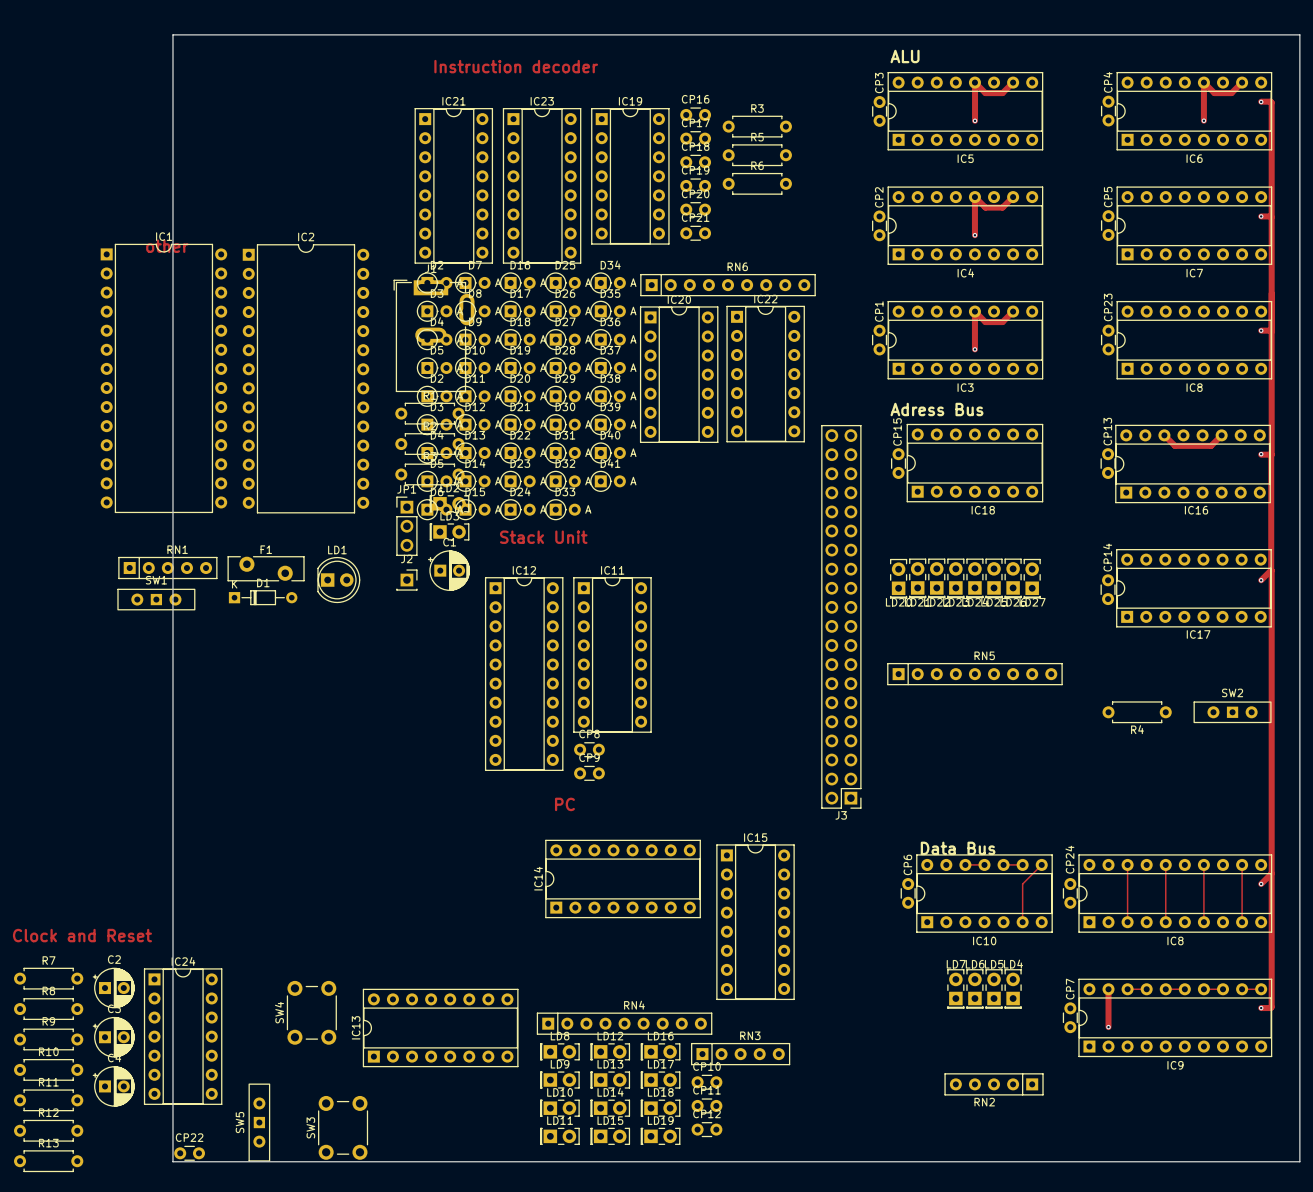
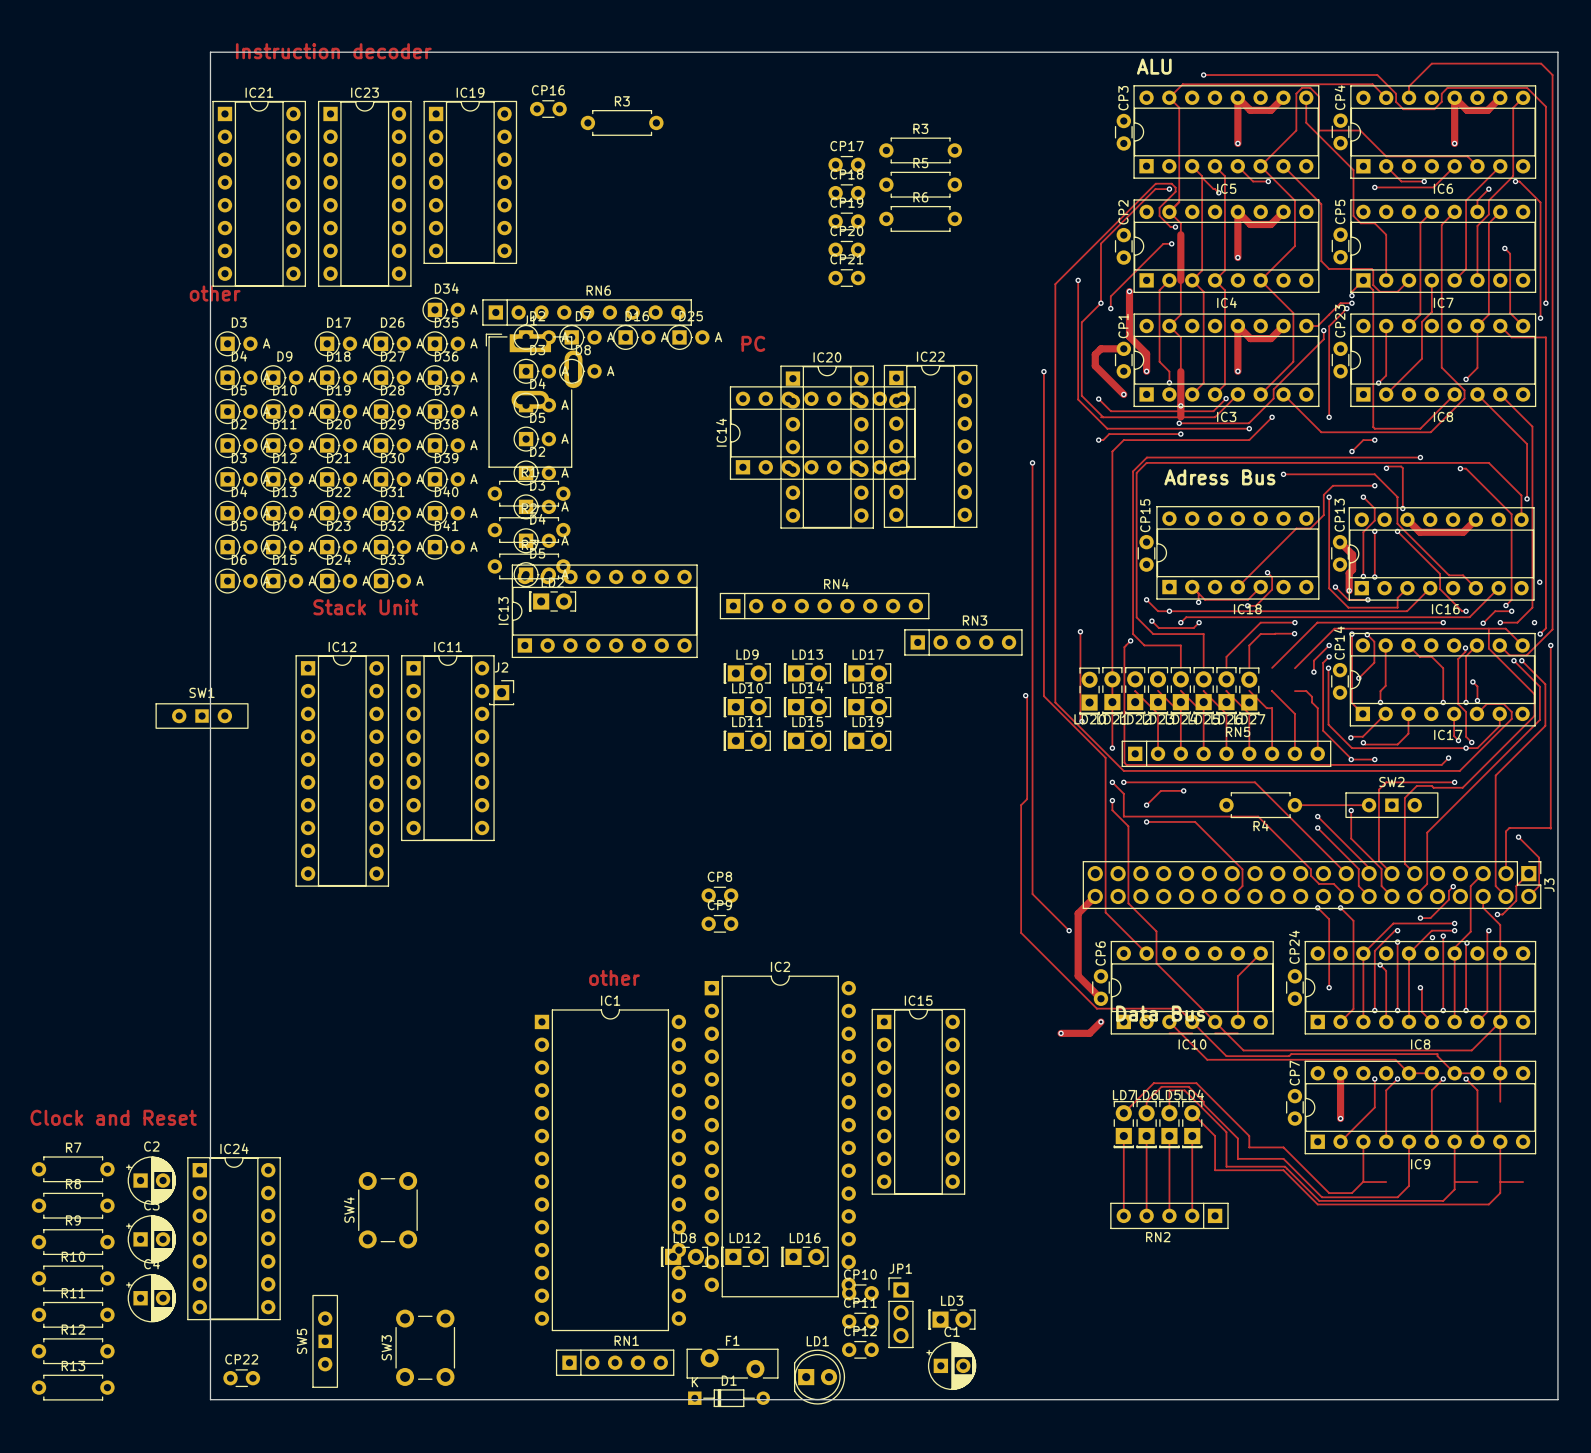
board edge: (172, 34) (1299, 34) (1299, 1161) (172, 1161) (172, 34) -> (210, 52) (1557, 52) (1557, 1399) (210, 1399) (210, 52)
text: none -> Instruction decoder (333, 51)
text position: ALU (905, 56) -> ALU (1154, 66)
track: none -> (1203, 75) (1377, 75) (1396, 93) (1396, 101) (1403, 109) (1434, 109) (1441, 101) (1441, 93) (1447, 87) (1527, 87) (1545, 106) (1545, 303)
via: none -> (1203, 75)
text: Instruction decoder (516, 66) -> none
track: (974, 82) (985, 93) (1002, 93) (1013, 82) -> (1237, 97) (1250, 110) (1270, 110) (1283, 97)
track: (975, 82) (975, 120) -> (1237, 97) (1237, 143)
track: none -> (1306, 97) (1306, 122) (1353, 170) (1353, 216) (1360, 223) (1374, 223) (1386, 234) (1386, 280)
track: none -> (1386, 97) (1372, 84) (1182, 84) (1169, 97) (1179, 107) (1179, 202)
track: none -> (1409, 97) (1409, 86) (1431, 63) (1541, 63) (1552, 75) (1552, 629) (1526, 655) (1509, 655) (1499, 645)
track: none -> (1523, 97) (1513, 107) (1513, 176) (1488, 200) (1488, 214) (1477, 225) (1477, 280)
track: (1261, 101) (1271, 102) (1271, 570) -> none
via: (1261, 101) -> none
R3: none -> (622, 122)
CP3 position: (879, 111) -> (1123, 132)
IC5 position: (965, 111) -> (1226, 131)
CP16 position: (695, 114) -> (548, 109)
via: (975, 120) -> none
via: none -> (1237, 143)
track: none -> (1192, 166) (1202, 176) (1202, 270) (1192, 280) (1203, 291) (1203, 383) (1192, 394)
track: none -> (1214, 166) (1224, 176) (1224, 270) (1215, 280) (1224, 290) (1224, 384) (1215, 394)
track: none -> (1237, 166) (1253, 181) (1268, 181)
track: none -> (1283, 166) (1321, 204) (1321, 261) (1329, 268) (1371, 268) (1373, 285) (1379, 291) (1397, 291) (1409, 280)
track: none -> (1386, 166) (1401, 181) (1424, 181)
track: none -> (1454, 166) (1433, 187) (1374, 187)
track: none -> (1477, 166) (1467, 156) (1386, 156) (1360, 130) (1319, 130) (1319, 96) (1310, 87) (1302, 87) (1296, 93) (1296, 130) (1260, 166) (1294, 200) (1294, 246) (1260, 280) (1293, 313) (1293, 361) (1260, 394)
track: none -> (1500, 166) (1466, 200) (1466, 268) (1454, 280)
track: none -> (1202, 177) (1218, 192)
via: none -> (1268, 181)
via: none -> (1424, 181)
track: none -> (1515, 181) (1519, 181) (1540, 202) (1540, 318)
via: none -> (1515, 181)
via: none -> (1374, 187)
track: none -> (1169, 189) (1155, 189) (1100, 243) (1100, 303) (1081, 322) (1081, 395) (1103, 417)
via: none -> (1169, 189)
track: none -> (1488, 189) (1477, 200) (1477, 211)
via: none -> (1488, 189)
via: none -> (1218, 192)
IC19 position: (630, 176) -> (470, 182)
track: none -> (1283, 211) (1270, 224) (1250, 224) (1237, 211) (1237, 257)
track: none -> (1431, 211) (1420, 223) (1420, 314) (1409, 326)
track: none -> (1454, 211) (1441, 224) (1441, 367) (1464, 390) (1464, 398) (1430, 432) (1321, 432) (1283, 394)
track: none -> (1500, 211) (1488, 223) (1488, 314) (1477, 326) (1477, 367) (1466, 379)
IC21 position: (453, 185) -> (259, 193)
IC23 position: (542, 185) -> (364, 193)
track: none -> (1175, 227) (1170, 227) (1159, 216) (1159, 207) (1175, 191) (1175, 187) (1171, 183) (1155, 183) (1055, 284) (1055, 702) (1123, 770) (1459, 770) (1511, 718) (1511, 711) (1503, 704) (1486, 704) (1476, 713)
via: none -> (1175, 227)
track: (974, 197) (985, 207) (1002, 207) (1013, 197) -> (1180, 234) (1180, 223) (1169, 211) (1179, 202)
track: none -> (1171, 243) (1163, 243) (1110, 296) (1110, 308)
via: none -> (1171, 243)
track: none -> (1504, 248) (1510, 253) (1510, 313) (1523, 326)
via: none -> (1237, 257)
track: (1261, 216) (1271, 217) -> none
via position: (1261, 216) -> (1504, 248)
CP2 position: (879, 225) -> (1123, 246)
IC4 position: (965, 225) -> (1226, 246)
CP5 position: (1108, 225) -> (1340, 245)
IC7 position: (1194, 225) -> (1443, 246)
track: none -> (1078, 280) (1078, 399) (1107, 428) (1249, 428)
via: none -> (1078, 280)
track: none -> (1169, 280) (1159, 290) (1159, 361) (1169, 371) (1169, 382)
via: (974, 235) -> none
track: none -> (1431, 280) (1431, 312) (1421, 321) (1421, 358) (1386, 394)
track: none -> (1129, 291) (1129, 336) (1146, 353) (1146, 371)
via: none -> (1129, 291)
track: none -> (1351, 295) (1351, 291) (1363, 280) (1373, 290) (1373, 427) (1374, 428) (1420, 428) (1454, 394)
via: none -> (1351, 295)
via: none -> (1100, 303)
track: none -> (1351, 303) (1340, 303) (1317, 326) (1306, 326)
via: none -> (1351, 303)
via: none -> (1545, 303)
via: none -> (1110, 308)
track: none -> (1346, 308) (1329, 326) (1329, 417)
via: none -> (1346, 308)
via: none -> (1540, 318)
track: none -> (1283, 326) (1270, 338) (1250, 338) (1237, 326) (1237, 371)
track: none -> (1386, 326) (1386, 375) (1378, 383)
track: none -> (1500, 326) (1511, 337) (1545, 337) (1545, 628) (1540, 634)
track: none -> (1323, 330) (1323, 339) (1273, 389) (1273, 398) (1248, 423) (1179, 423)
via: none -> (1323, 330)
D34 position: (608, 282) -> (443, 309)
RN6 position: (728, 285) -> (587, 312)
D3: none -> (236, 343)
text: none -> PC (753, 343)
track: none -> (1123, 348) (1100, 348) (1095, 354) (1095, 365) (1123, 394)
D17 position: (517, 311) -> (335, 343)
D26 position: (563, 311) -> (389, 343)
D35 position: (608, 311) -> (443, 343)
track: none -> (1043, 371) (1043, 696) (1105, 757) (1105, 912) (1146, 953)
via: none -> (1043, 371)
via: none -> (1146, 371)
track: (974, 311) (985, 322) (1002, 322) (1013, 311) -> (1180, 371) (1180, 337) (1169, 326) (1180, 314) (1180, 280)
via: none -> (1237, 371)
D4: none -> (236, 377)
via: none -> (1466, 379)
via: none -> (1169, 382)
via: none -> (1378, 383)
via: none -> (1123, 394)
track: none -> (1237, 394) (1215, 417) (1100, 417)
track: none -> (1477, 394) (1527, 444) (1527, 498)
track: none -> (1500, 394) (1532, 426) (1532, 607) (1517, 622) (1500, 622)
track: (1261, 330) (1271, 331) -> none
via: (1261, 330) -> none
via: none -> (1098, 399)
track: none -> (1226, 398) (1213, 411) (1110, 411) (1098, 399)
via: none -> (1226, 398)
D9 position: (472, 339) -> (282, 377)
D18 position: (517, 339) -> (335, 377)
D27 position: (563, 339) -> (389, 377)
D36 position: (608, 339) -> (443, 377)
CP1 position: (879, 340) -> (1123, 360)
IC3 position: (965, 340) -> (1226, 360)
via: none -> (1180, 405)
CP23 position: (1108, 340) -> (1340, 360)
IC8 position: (1194, 340) -> (1443, 360)
D5: none -> (236, 411)
via: (974, 349) -> none
track: none -> (1272, 417) (1249, 440) (1123, 440) (1112, 451) (1112, 748)
via: none -> (1272, 417)
via: none -> (1329, 417)
via: none -> (1179, 423)
via: none -> (1249, 428)
track: none -> (1180, 434) (1109, 434) (1103, 440) (1098, 440)
via: none -> (1180, 434)
D10 position: (472, 367) -> (282, 411)
D19 position: (517, 367) -> (335, 411)
D28 position: (563, 367) -> (389, 411)
D37 position: (608, 367) -> (443, 411)
via: none -> (1098, 440)
track: none -> (1374, 440) (1363, 440) (1351, 451)
via: none -> (1374, 440)
D2: none -> (236, 445)
IC1 position: (163, 378) -> (610, 1170)
IC2 position: (306, 378) -> (780, 1136)
via: none -> (1351, 451)
track: none -> (1420, 457) (1146, 457) (1133, 471) (1133, 634) (1144, 645) (1180, 645) (1180, 667)
via: none -> (1420, 457)
track: none -> (1032, 462) (1032, 894) (1069, 930)
via: none -> (1032, 462)
track: none -> (1386, 468) (1388, 466) (1402, 468) (1402, 508)
via: none -> (1386, 468)
track: none -> (1460, 468) (1466, 468) (1511, 514) (1511, 599) (1505, 605)
via: none -> (1460, 468)
D11 position: (472, 396) -> (282, 445)
D20 position: (517, 396) -> (335, 445)
D29 position: (563, 396) -> (389, 445)
D38 position: (608, 396) -> (443, 445)
track: none -> (1283, 474) (1374, 474) (1397, 497) (1397, 523) (1449, 575) (1463, 575) (1475, 588)
via: none -> (1283, 474)
D3: none -> (236, 479)
track: none -> (1374, 485) (1332, 485) (1323, 494) (1323, 515) (1310, 528) (1296, 528) (1237, 587)
via: none -> (1374, 485)
text position: Adress Bus (936, 409) -> Adress Bus (1219, 477)
track: none -> (1329, 497) (1329, 588) (1348, 607) (1397, 607) (1397, 597) (1407, 588)
via: none -> (1329, 497)
track: none -> (1363, 497) (1374, 508) (1374, 520) (1363, 532) (1363, 576)
via: none -> (1363, 497)
via: none -> (1527, 498)
D12 position: (472, 424) -> (282, 479)
D21 position: (517, 424) -> (335, 479)
D30 position: (563, 424) -> (389, 479)
D39 position: (608, 424) -> (443, 479)
via: none -> (1402, 508)
D4: none -> (236, 513)
track: none -> (1521, 519) (1521, 495) (1488, 462) (1146, 462) (1136, 472) (1136, 617) (1153, 634) (1203, 634) (1203, 667)
track: none -> (1374, 531) (1374, 577)
via: none -> (1374, 531)
track: none -> (1397, 531) (1440, 573) (1440, 589) (1462, 611) (1466, 611)
via: none -> (1397, 531)
D13 position: (472, 453) -> (282, 513)
D22 position: (517, 453) -> (335, 513)
D31 position: (563, 453) -> (389, 513)
D40 position: (608, 453) -> (443, 513)
track: none -> (1340, 542) (1352, 554) (1352, 569) (1349, 573) (1349, 590)
track: (1261, 454) (1270, 454) -> none
via: (1261, 454) -> none
D5: none -> (236, 547)
CP15 position: (898, 463) -> (1146, 553)
IC18 position: (974, 463) -> (1237, 552)
track: none -> (1267, 572) (1272, 577) (1272, 589) (1255, 605) (1247, 605)
via: none -> (1267, 572)
D14 position: (472, 481) -> (282, 547)
D23 position: (517, 481) -> (335, 547)
D32 position: (563, 481) -> (389, 547)
D41 position: (608, 481) -> (443, 547)
via: none -> (1363, 576)
via: none -> (1374, 577)
via: none -> (1539, 582)
track: none -> (1192, 587) (1205, 599) (1247, 599) (1260, 587)
track: none -> (1335, 587) (1348, 599) (1367, 599)
via: none -> (1335, 587)
track: none -> (1430, 588) (1407, 611) (1158, 611) (1146, 599)
track: none -> (1498, 588) (1469, 617) (1186, 617) (1180, 622)
via: none -> (1349, 590)
track: none -> (1198, 593) (1198, 602)
via: none -> (1146, 599)
via: none -> (1367, 599)
via: none -> (1198, 602)
via: none -> (1247, 605)
via: none -> (1505, 605)
text: none -> Stack Unit (365, 607)
D6 position: (434, 509) -> (236, 581)
D15 position: (472, 509) -> (282, 581)
D24 position: (517, 509) -> (335, 581)
D33 position: (563, 509) -> (389, 581)
via: none -> (1169, 611)
via: none -> (1466, 611)
track: none -> (1511, 611) (1495, 611) (1483, 623)
via: none -> (1511, 611)
track: none -> (1151, 621) (1158, 628) (1193, 628) (1199, 622)
via: none -> (1151, 621)
via: none -> (1180, 622)
via: none -> (1199, 622)
track: none -> (1294, 622) (1260, 622) (1226, 656) (1226, 667)
via: none -> (1294, 622)
track: none -> (1443, 622) (1317, 622) (1272, 667)
via: none -> (1443, 622)
via: none -> (1483, 623)
via: none -> (1500, 622)
via: none -> (1534, 622)
JP1 position: (406, 526) -> (900, 1312)
track: none -> (1488, 628) (1488, 648) (1534, 694) (1534, 715) (1462, 787) (1416, 785) (1404, 797) (1404, 863) (1414, 873)
track: none -> (1080, 631) (1080, 719) (1081, 721)
via: none -> (1080, 631)
track: none -> (1294, 633) (1260, 634) (1249, 645) (1249, 667)
via: none -> (1294, 633)
LD3 position: (449, 531) -> (951, 1319)
track: none -> (1351, 634) (1351, 703) (1362, 713)
via: none -> (1351, 634)
track: none -> (1367, 634) (1374, 641) (1374, 662) (1358, 678)
via: none -> (1367, 634)
via: none -> (1540, 634)
track: none -> (1130, 640) (1124, 647) (1124, 762) (1126, 764) (1441, 764) (1448, 758)
via: none -> (1130, 640)
text: Stack Unit (543, 537) -> none
track: none -> (1329, 645) (1313, 660) (1313, 672)
via: none -> (1329, 645)
track: none -> (1385, 645) (1385, 685) (1380, 691) (1380, 702)
track: none -> (1408, 645) (1419, 656) (1431, 656) (1443, 668) (1443, 702)
track: none -> (1476, 645) (1466, 656) (1466, 702)
track: none -> (1522, 645) (1505, 628) (1334, 628) (1294, 668)
track: none -> (1550, 645) (1550, 828)
via: none -> (1550, 645)
track: none -> (1465, 648) (1465, 651) (1458, 659) (1458, 704) (1466, 711) (1466, 736) (1471, 742)
via: none -> (1465, 648)
track: none -> (1329, 656) (1323, 662) (1323, 730) (1351, 759) (1374, 759)
via: none -> (1329, 656)
track: none -> (1513, 660) (1539, 686) (1539, 719) (1427, 832) (1427, 883) (1414, 896)
via: none -> (1513, 660)
track: none -> (1521, 660) (1545, 684) (1545, 725) (1495, 775) (1495, 886) (1505, 896)
via: none -> (1521, 660)
track: none -> (1328, 668) (1328, 724) (1351, 748) (1477, 748) (1499, 725) (1499, 713)
via: none -> (1328, 668)
via: none -> (1313, 672)
via: none -> (1358, 678)
RN1 position: (167, 568) -> (615, 1362)
F1 position: (266, 568) -> (732, 1363)
C1 position: (448, 570) -> (951, 1365)
track: (1271, 570) (1271, 1007) (1261, 1008) -> none
track: (1271, 570) (1261, 580) -> none
track: none -> (1472, 681) (1477, 686) (1477, 700)
via: none -> (1472, 681)
track: none -> (1135, 691) (1158, 713) (1158, 753)
track: none -> (1158, 690) (1175, 708) (1180, 708) (1180, 753)
track: none -> (1180, 690) (1198, 708) (1203, 708) (1203, 753)
track: none -> (1203, 690) (1226, 713) (1226, 753)
track: none -> (1226, 690) (1249, 713) (1249, 753)
track: none -> (1249, 690) (1266, 708) (1272, 708) (1272, 753)
track: none -> (1272, 690) (1294, 713) (1294, 753)
track: none -> (1294, 691) (1306, 691) (1312, 696) (1312, 702) (1317, 708) (1317, 753)
LD1 position: (338, 580) -> (819, 1377)
via: (1261, 580) -> none
track: none -> (1025, 695) (1027, 799) (1021, 805) (1021, 932) (1096, 1008) (1178, 1008) (1226, 1056) (1437, 1054) (1454, 1073) (1477, 1073)
via: none -> (1025, 695)
via: none -> (1477, 700)
via: none -> (1380, 702)
IC17 position: (1193, 588) -> (1442, 679)
via: none -> (1443, 702)
via: none -> (1466, 702)
CP14 position: (1108, 589) -> (1340, 681)
D1 position: (263, 597) -> (729, 1398)
track: none -> (1385, 713) (1362, 736) (1350, 737)
track: none -> (1408, 713) (1408, 733) (1397, 744) (1365, 744) (1363, 742)
track: none -> (1454, 713) (1454, 736) (1458, 740)
via: none -> (1081, 721)
J3 rotation: 0° (841, 616) -> 90° counterclockwise (1312, 885)
J3 position: (841, 616) -> (1312, 885)
via: none -> (1350, 737)
via: none -> (1458, 740)
via: none -> (1363, 742)
via: none -> (1471, 742)
via: none -> (1112, 748)
via: none -> (1466, 748)
via: none -> (1448, 758)
via: none -> (1351, 759)
via: none -> (1374, 759)
IC11 position: (612, 654) -> (447, 748)
track: none -> (1112, 782) (1123, 793) (1123, 816) (1258, 816) (1310, 869) (1310, 875) (1319, 883) (1333, 883) (1346, 896)
via: none -> (1112, 782)
track: none -> (1123, 782) (1255, 782) (1346, 873)
via: none -> (1123, 782)
track: none -> (1454, 782) (1386, 782) (1378, 789) (1378, 860) (1391, 873)
via: none -> (1454, 782)
track: none -> (1183, 790) (1160, 790) (1146, 805)
via: none -> (1183, 790)
track: none -> (1112, 800) (1112, 810) (1128, 826) (1128, 903) (1156, 931) (1156, 963) (1243, 1050) (1471, 1050) (1500, 1021)
via: none -> (1112, 800)
IC12 position: (524, 674) -> (342, 770)
via: none -> (1146, 805)
RN5 position: (974, 674) -> (1226, 753)
track: none -> (1294, 805) (1369, 805)
track: none -> (1351, 810) (1351, 838) (1381, 869) (1381, 886) (1391, 896)
via: none -> (1351, 810)
track: none -> (1317, 816) (1369, 867) (1369, 873)
via: none -> (1317, 816)
track: none -> (1146, 821) (1195, 821) (1242, 869) (1242, 886) (1232, 896)
via: none -> (1146, 821)
track: none -> (1317, 827) (1358, 869) (1358, 886) (1369, 896)
via: none -> (1317, 827)
track: none -> (1550, 827) (1509, 827) (1505, 831) (1505, 873)
track: none -> (1518, 837) (1539, 857) (1539, 886) (1528, 896)
via: none -> (1518, 837)
R4 position: (1137, 712) -> (1260, 805)
SW2 position: (1232, 712) -> (1391, 805)
track: none -> (1483, 873) (1470, 886) (1470, 931) (1454, 947) (1454, 1021)
track: none -> (1528, 873) (1516, 886) (1516, 900) (1502, 914) (1497, 914)
track: none -> (1453, 886) (1448, 890) (1448, 899) (1430, 918) (1420, 918)
via: none -> (1453, 886)
track: none -> (1095, 896) (1078, 913) (1078, 975) (1100, 998)
track: none -> (1483, 896) (1483, 907) (1500, 924) (1500, 1033)
track: none -> (1317, 907) (1329, 919) (1329, 987)
via: none -> (1317, 907)
track: none -> (1340, 907) (1353, 920) (1353, 1009) (1340, 1021)
via: none -> (1340, 907)
via: none -> (1497, 914)
via: none -> (1420, 918)
track: none -> (1454, 923) (1393, 923) (1363, 953) (1363, 1021)
via: none -> (1454, 923)
via: none -> (1069, 930)
track: none -> (1397, 930) (1395, 930) (1374, 950) (1374, 1010)
via: none -> (1397, 930)
track: none -> (1454, 930) (1431, 930) (1409, 953) (1409, 1021)
via: none -> (1454, 930)
track: none -> (1488, 930) (1487, 1012) (1477, 1021)
via: none -> (1488, 930)
track: none -> (1443, 936) (1443, 1010)
via: none -> (1443, 936)
via: none -> (1432, 937)
via: none -> (1397, 942)
track: none -> (1467, 943) (1466, 1010)
via: none -> (1467, 943)
text: PC (564, 804) -> none
track: none -> (1380, 964) (1386, 970) (1386, 1021)
via: none -> (1380, 964)
text: none -> other (614, 977)
via: none -> (1329, 987)
track: none -> (1420, 987) (1421, 1012) (1431, 1021)
via: none -> (1420, 987)
via: none -> (1374, 1010)
via: none -> (1397, 1010)
via: none -> (1443, 1010)
via: none -> (1466, 1010)
track: none -> (1100, 1021) (1089, 1033) (1061, 1033)
via: none -> (1100, 1021)
track: none -> (1169, 1021) (1207, 1059) (1395, 1059) (1409, 1073) (1431, 1073)
via: none -> (1061, 1033)
track: (1041, 864) (1022, 884) (1022, 922) -> (1260, 953) (1237, 976) (1237, 1021)
track: (1127, 864) (1127, 922) -> none
track: (1165, 864) (1165, 922) -> (1397, 942) (1397, 1010)
track: (1203, 864) (1203, 922) -> none
track: (1271, 873) (1261, 884) -> none
IC14 position: (623, 878) -> (822, 433)
via: (1261, 884) -> none
CP6 position: (908, 893) -> (1100, 987)
IC10 position: (984, 893) -> (1192, 987)
CP24 position: (1070, 893) -> (1294, 987)
IC8 position: (1175, 893) -> (1420, 987)
track: none -> (1374, 1078) (1374, 1107) (1340, 1141)
via: none -> (1374, 1078)
track: none -> (1397, 1078) (1386, 1090) (1386, 1141)
via: none -> (1397, 1078)
track: none -> (1443, 1078) (1431, 1090) (1431, 1141)
via: none -> (1443, 1078)
track: none -> (1466, 1078) (1477, 1090) (1477, 1141)
via: none -> (1466, 1078)
track: none -> (1123, 1113) (1153, 1083) (1196, 1083) (1249, 1136) (1249, 1147) (1283, 1147) (1329, 1193) (1351, 1193) (1363, 1181) (1363, 1141)
track: none -> (1146, 1113) (1146, 1101) (1161, 1086) (1188, 1086) (1237, 1138) (1237, 1158) (1283, 1158) (1321, 1197) (1397, 1197) (1409, 1185) (1409, 1141)
track: none -> (1169, 1113) (1169, 1090) (1184, 1090) (1226, 1132) (1226, 1166) (1285, 1166) (1319, 1200) (1443, 1200) (1454, 1189) (1454, 1141)
track: none -> (1192, 1113) (1215, 1136) (1215, 1170) (1283, 1170) (1317, 1204) (1488, 1204) (1500, 1193) (1500, 1141)
via: none -> (1340, 1118)
track: none -> (1123, 1136) (1123, 1215)
track: none -> (1146, 1136) (1146, 1215)
track: none -> (1169, 1136) (1169, 1215)
track: none -> (1192, 1136) (1192, 1215)
LD7 position: (955, 988) -> (1123, 1124)
LD6 position: (974, 988) -> (1146, 1124)
LD5 position: (994, 988) -> (1169, 1124)
LD4 position: (1013, 988) -> (1192, 1124)
track: (1108, 989) (1108, 1027) -> (1340, 1073) (1340, 1118)
track: (1165, 989) (1184, 989) -> none
via: (1261, 1008) -> none
CP7 position: (1070, 1017) -> (1294, 1107)
IC9 position: (1175, 1017) -> (1420, 1107)
RN4 position: (624, 1023) -> (824, 606)
IC13 position: (440, 1027) -> (604, 611)
via: (1108, 1027) -> none
RN3 position: (740, 1054) -> (963, 642)
LD9 position: (559, 1080) -> (747, 673)
LD13 position: (610, 1080) -> (807, 673)
LD17 position: (660, 1080) -> (867, 673)
RN2 position: (994, 1084) -> (1169, 1215)
LD10 position: (559, 1108) -> (747, 707)
LD14 position: (610, 1108) -> (807, 707)
LD18 position: (660, 1108) -> (867, 707)
LD11 position: (559, 1136) -> (747, 740)
LD15 position: (610, 1136) -> (807, 740)
LD19 position: (660, 1136) -> (867, 740)

